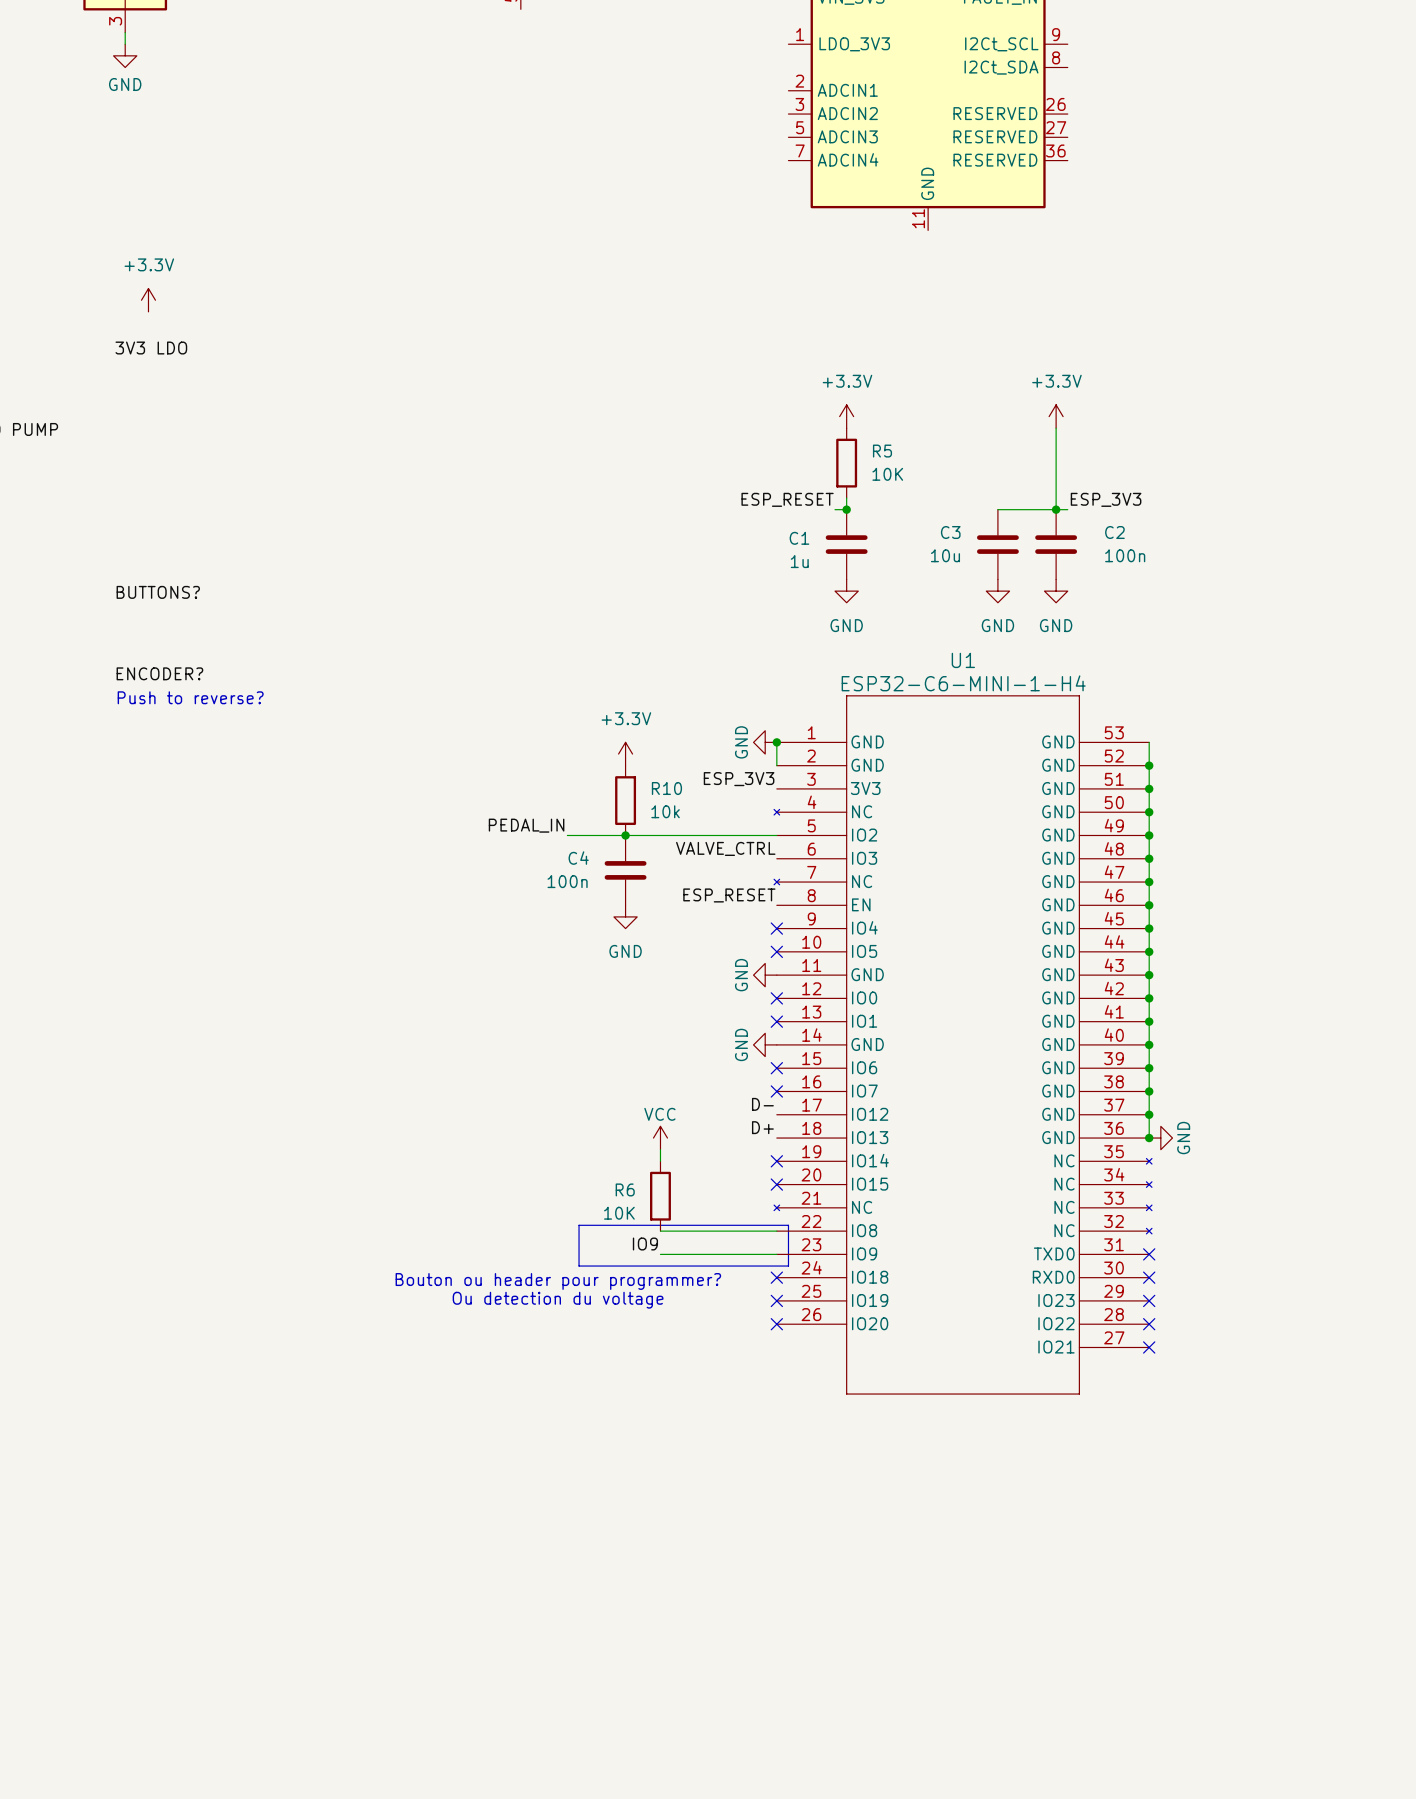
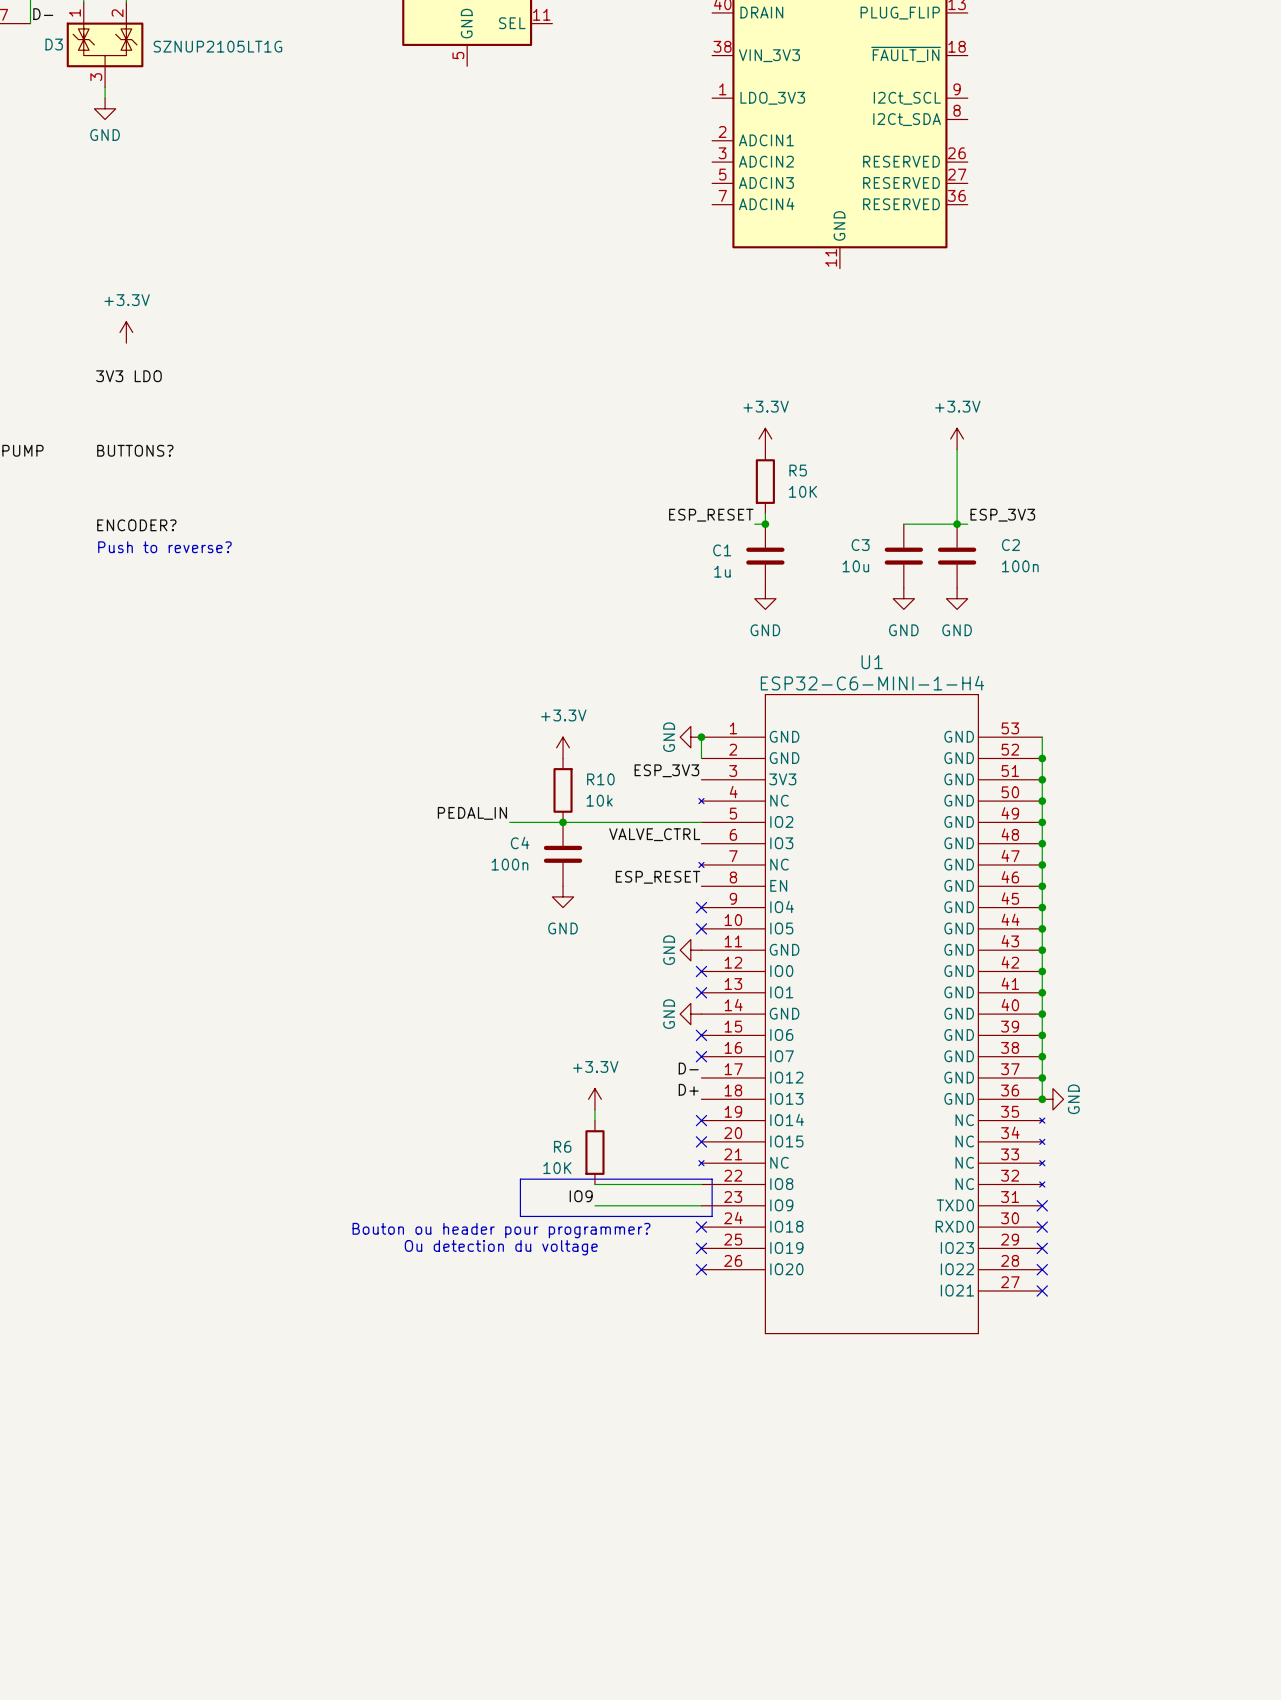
label position: BUTTONS? (158, 592) -> BUTTONS? (135, 450)
label position: ENCODER? (159, 673) -> ENCODER? (136, 525)
text position: Push to reverse? (190, 697) -> Push to reverse? (164, 547)
power symbol: VCC (660, 1138) -> +3.3V (594, 1099)

